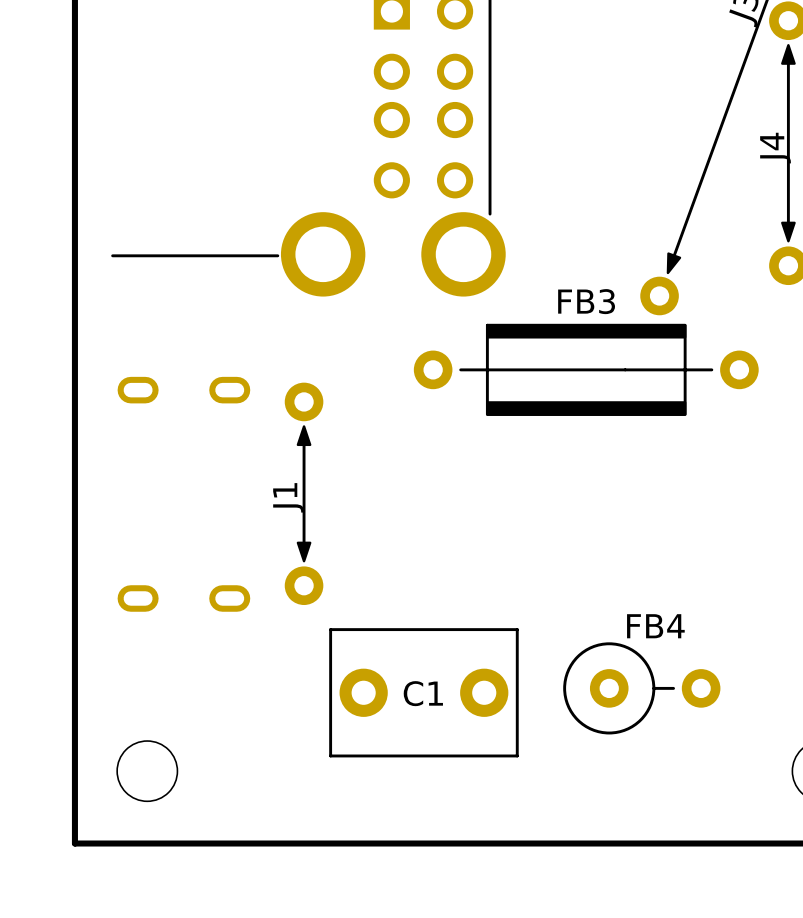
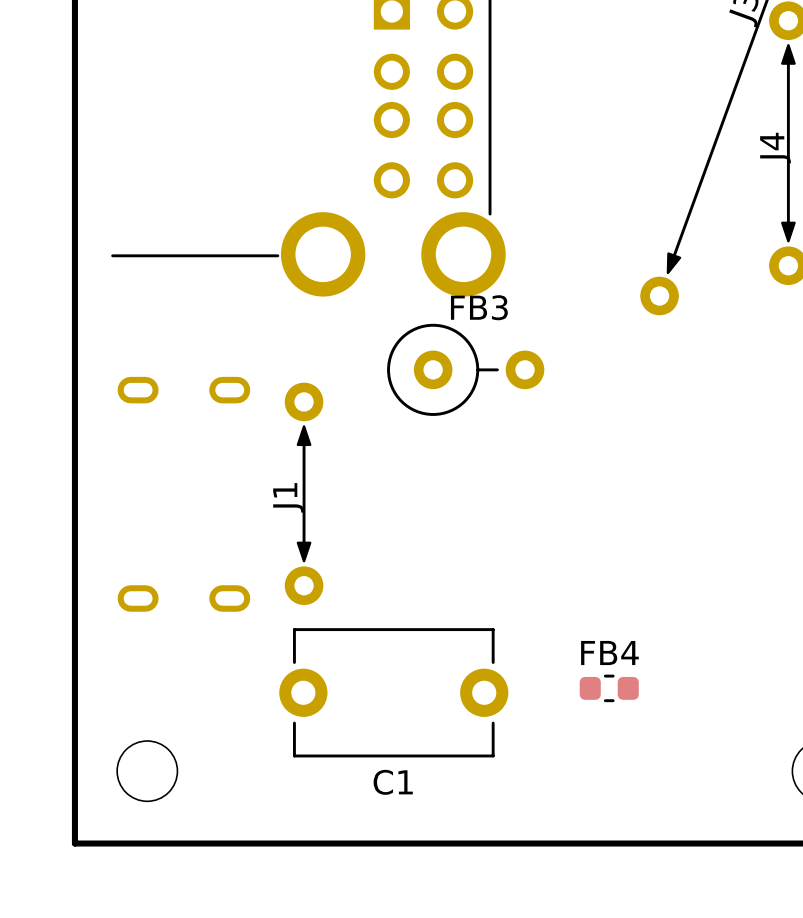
FB3 footprint: [413, 323, 759, 416] -> [387, 323, 545, 416]
C1 footprint: [329, 628, 519, 758] -> [279, 628, 509, 758]
FB4 footprint: [563, 642, 721, 735] -> [579, 674, 639, 703]
C1 name position: C1 (423, 693) -> C1 (393, 782)

